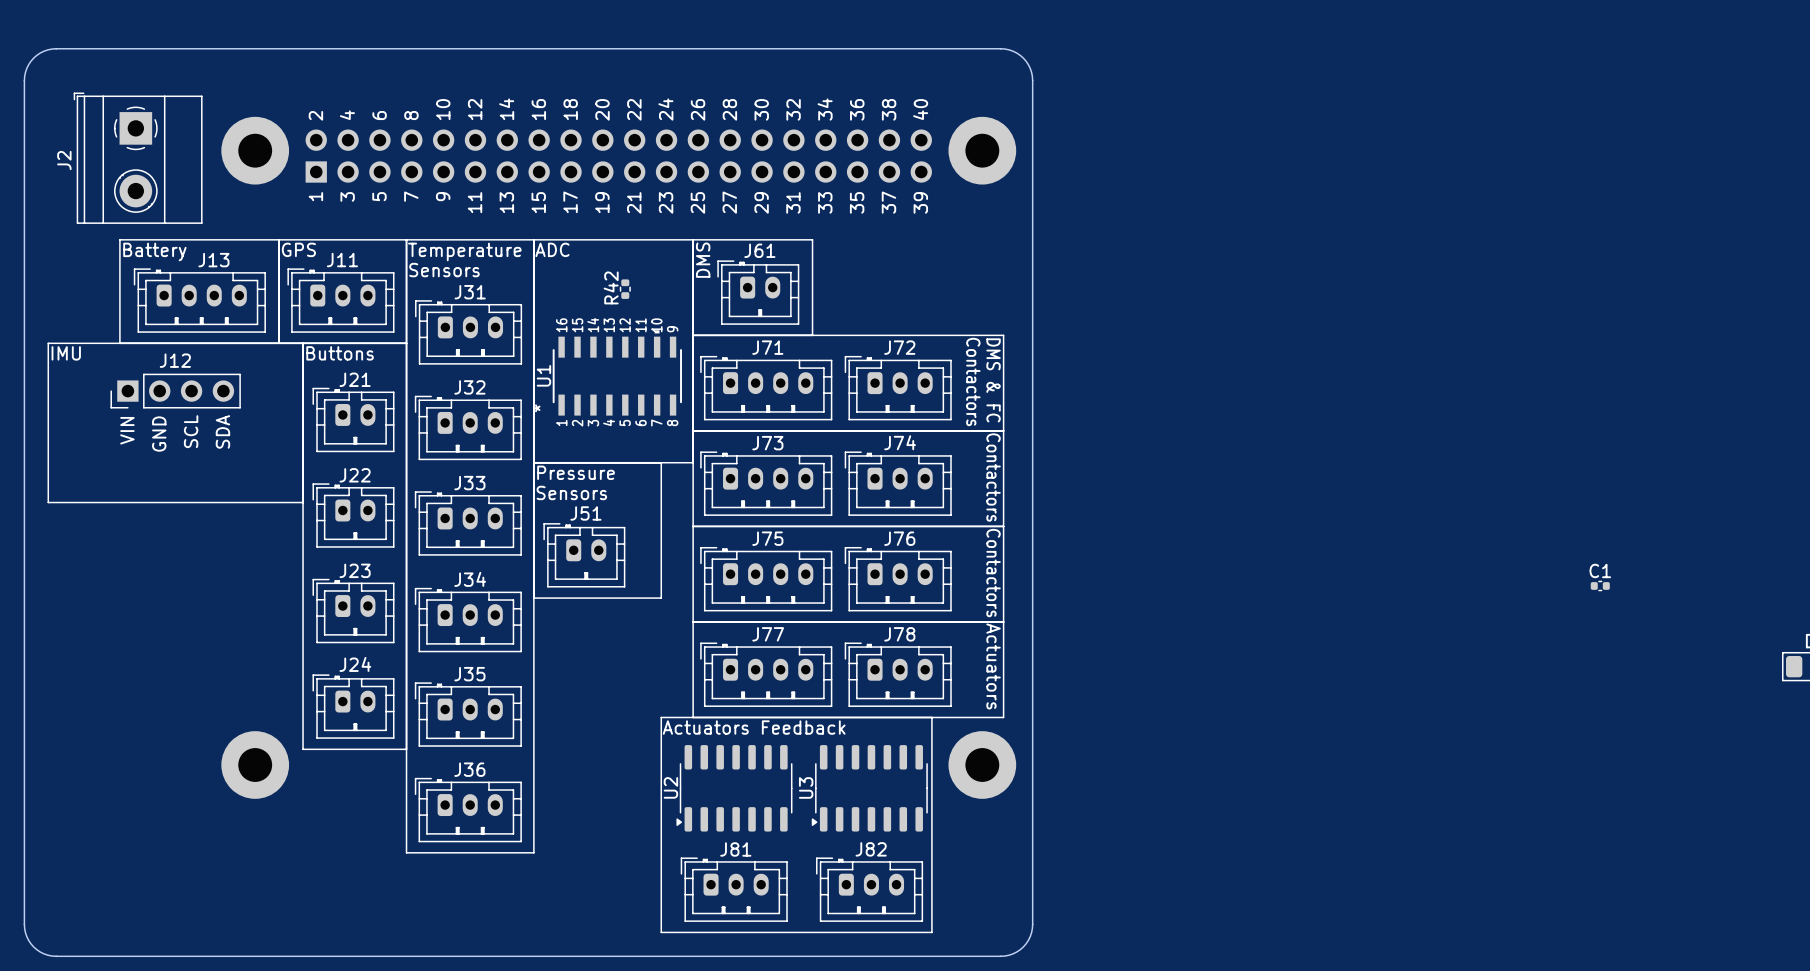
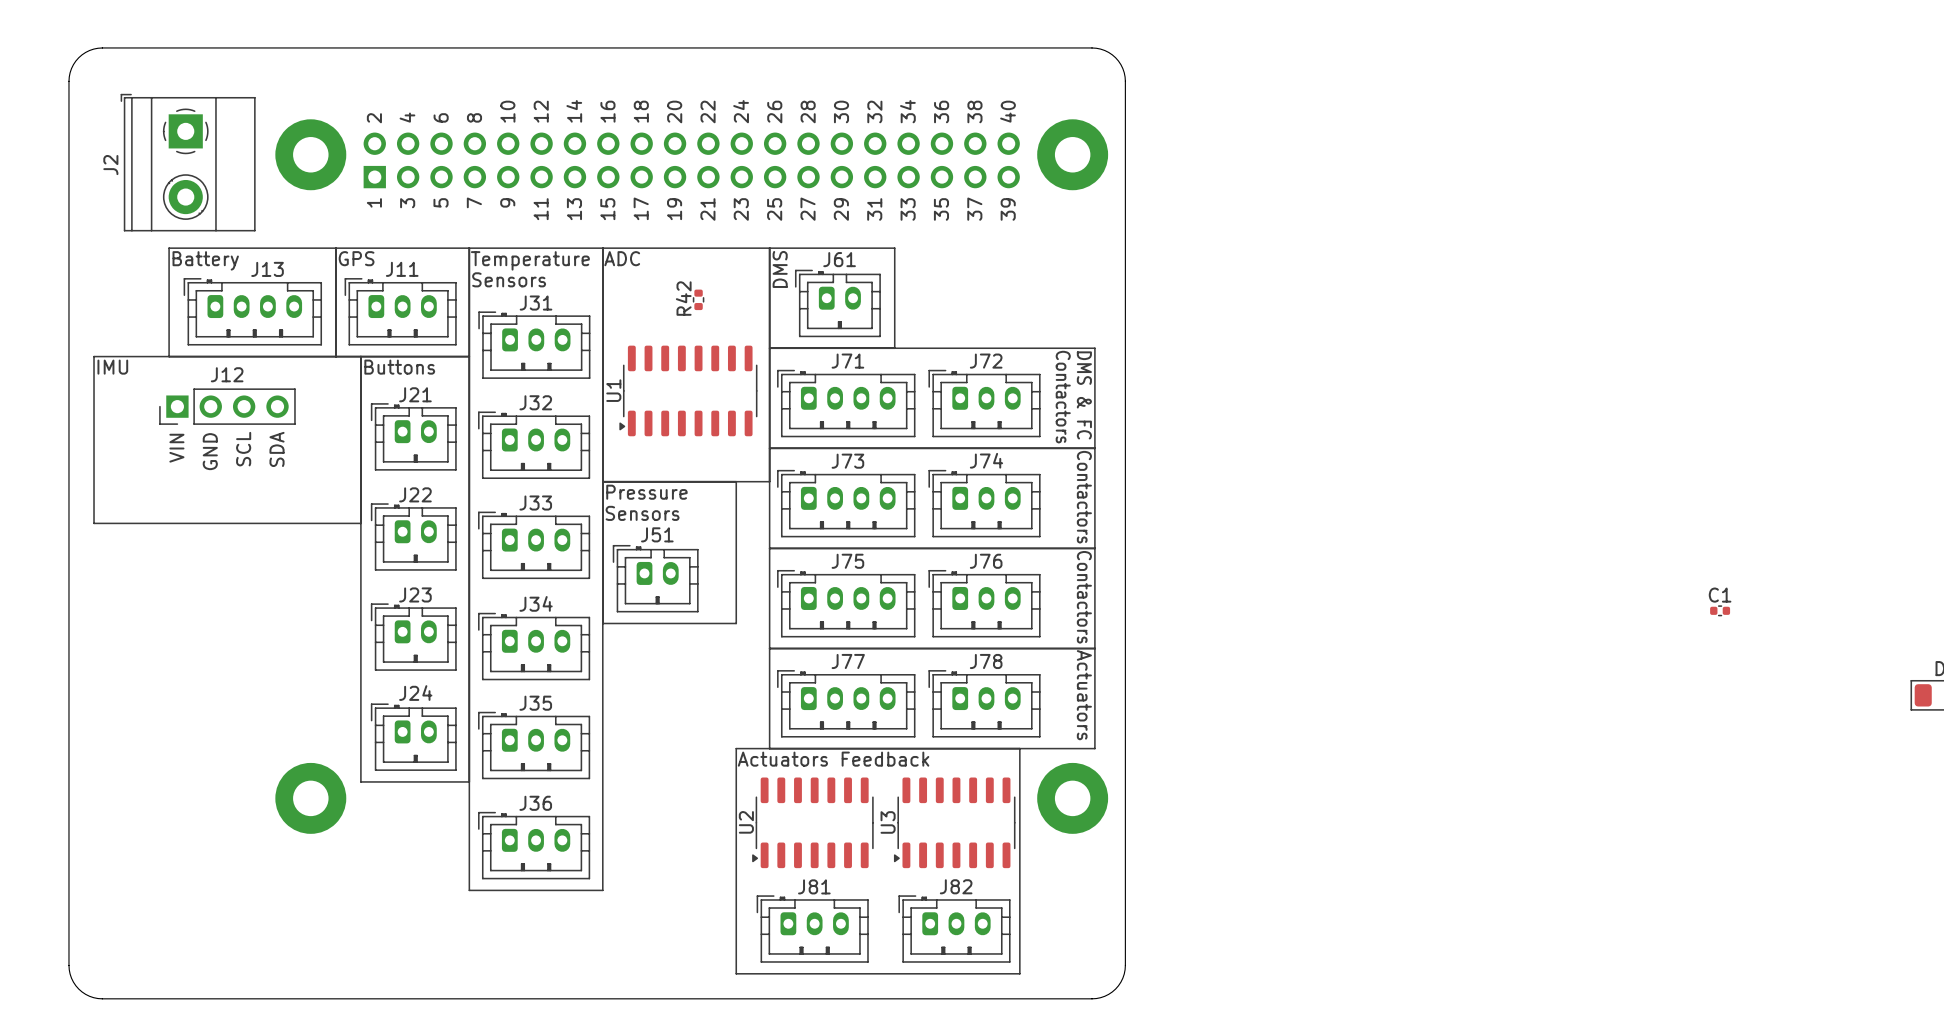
text: 16 (561, 325) -> none
text: 15 (577, 325) -> none
text: 14 (593, 325) -> none
text: 13 (609, 325) -> none
text: 12 (625, 325) -> none
text: 11 (640, 325) -> none
text: 10 (656, 325) -> none
text: 9 (672, 329) -> none
U1 footprint: [552, 330, 682, 416] -> [619, 345, 758, 437]
text: 4 (609, 422) -> none
text: 1 (561, 423) -> none
text: 2 (577, 423) -> none
text: 3 (593, 423) -> none
text: 5 (625, 423) -> none
text: 6 (640, 423) -> none
text: 7 (656, 423) -> none
text: 8 (672, 423) -> none

